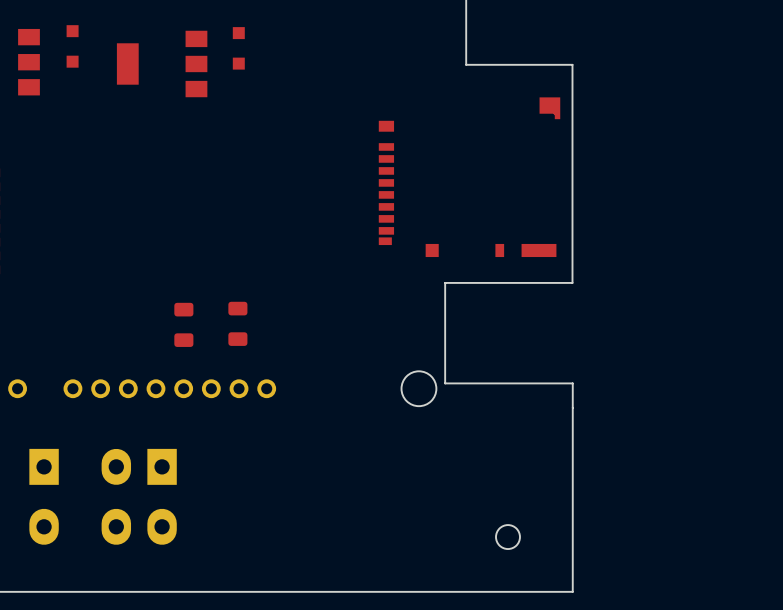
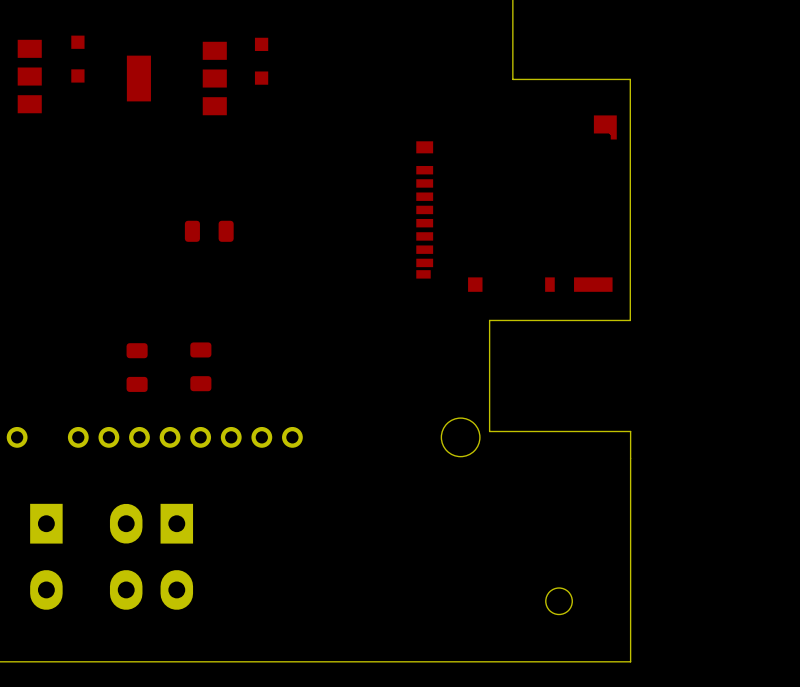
part: none -> (209, 231)
part: (237, 323) -> none
part: none -> (137, 367)

